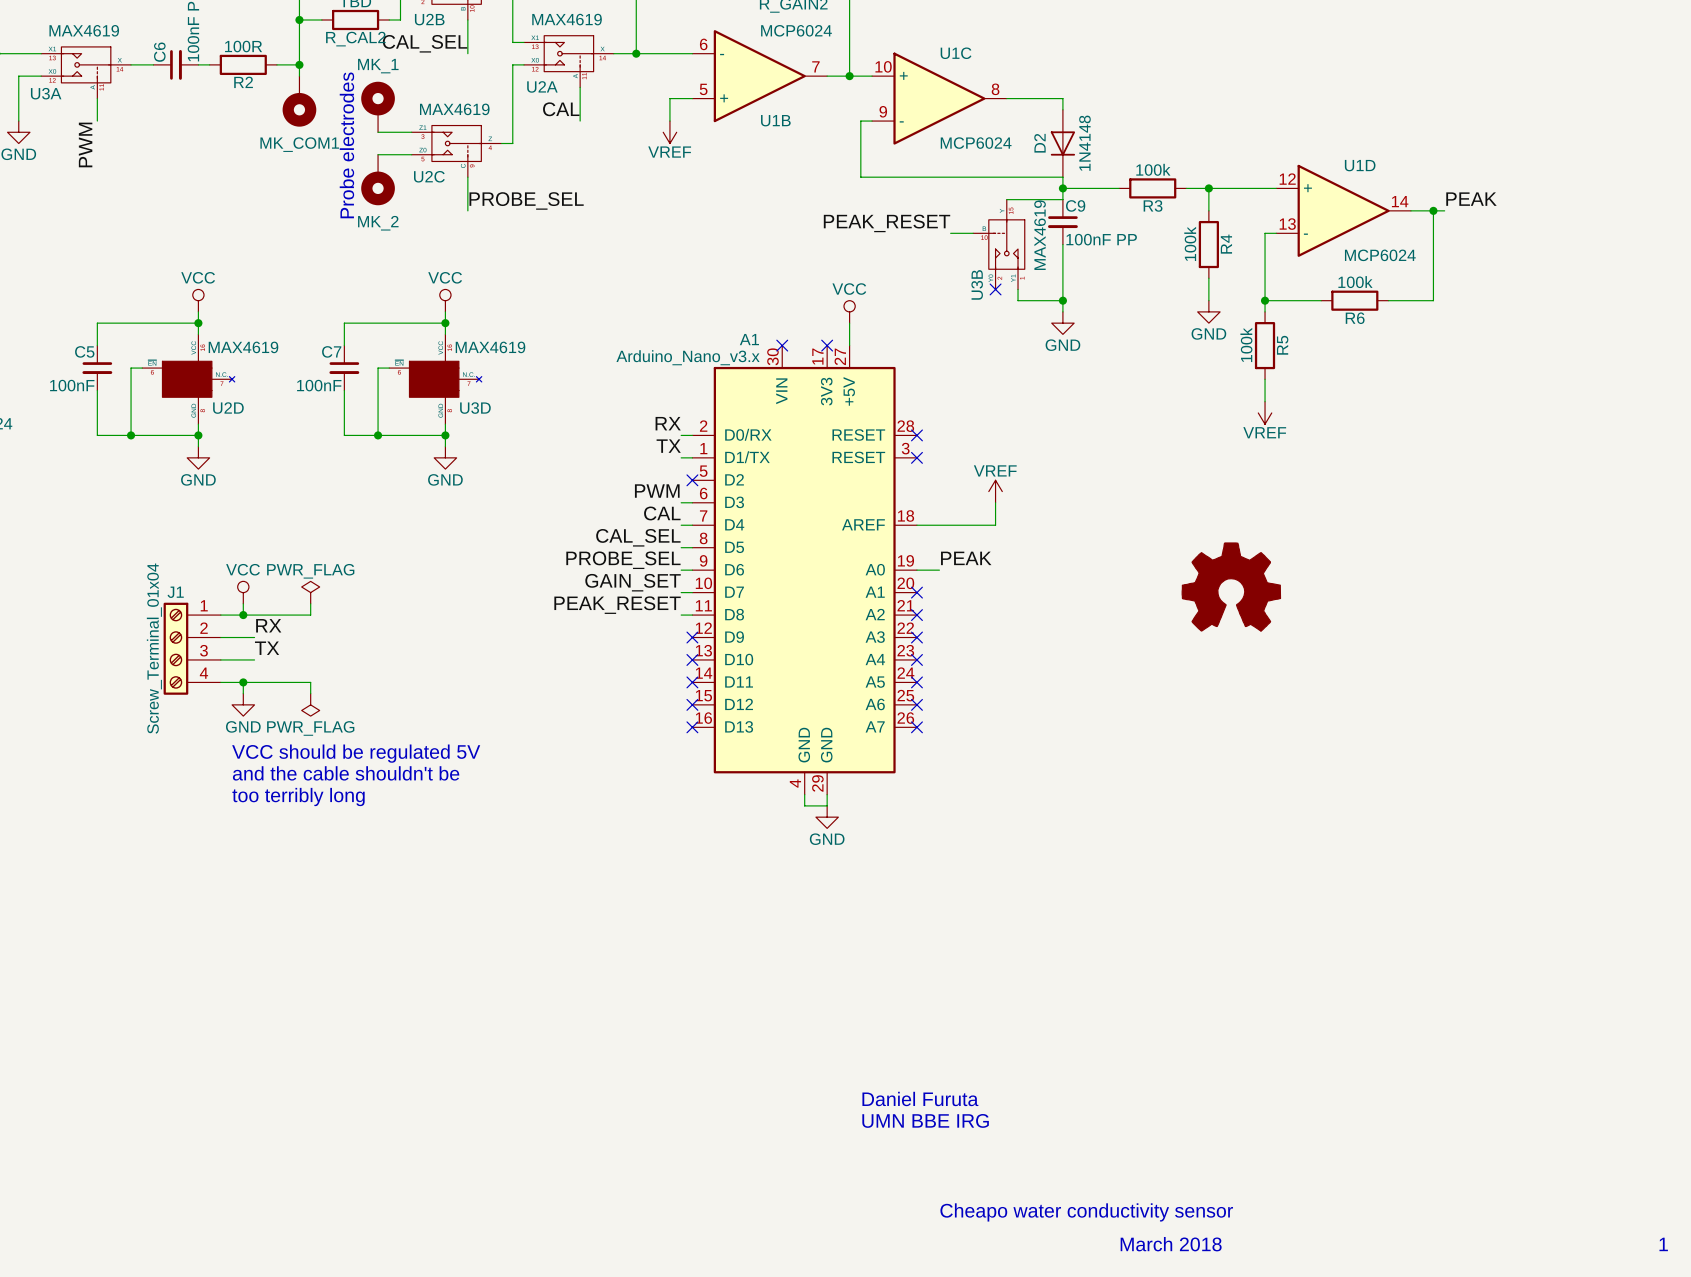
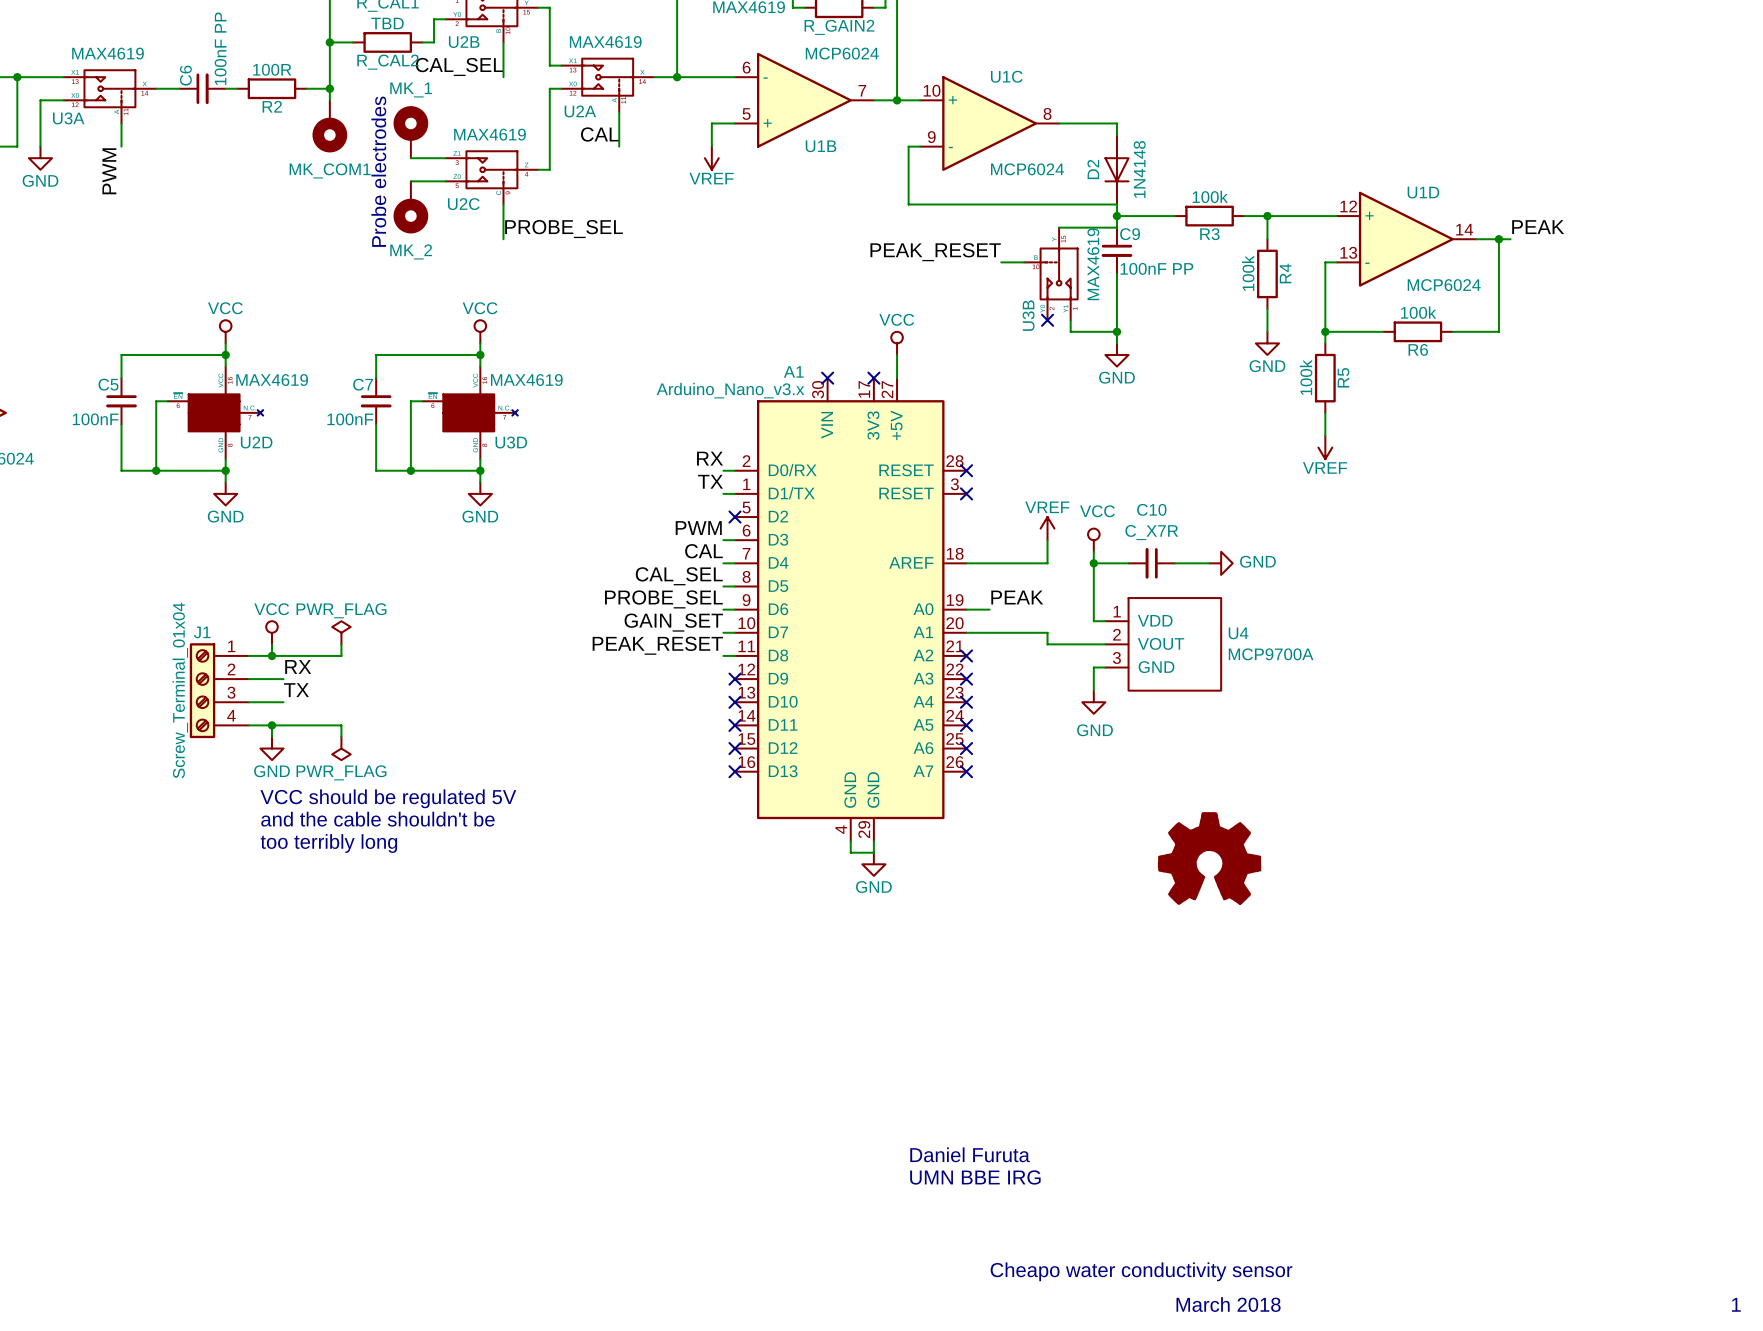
power symbol: none -> VCC (1093, 540)
wire: none -> (1093, 551) (1093, 621) (1105, 621)
wire: none -> (1093, 563) (1128, 563)
junction: none -> (1093, 563)
C10: none -> C_X7R (1151, 563)
wire: none -> (1174, 563) (1209, 563)
power symbol: none -> GND (1221, 563)
power symbol: (1231, 586) -> none
wire: none -> (966, 632) (1047, 632) (1047, 644) (1105, 644)
no-connect mark: (916, 592) -> none
U4: none -> MCP9700A (1163, 644)
wire: none -> (1105, 667) (1093, 667) (1093, 690)
power symbol: none -> GND (1093, 702)
power symbol: none -> (1209, 858)

